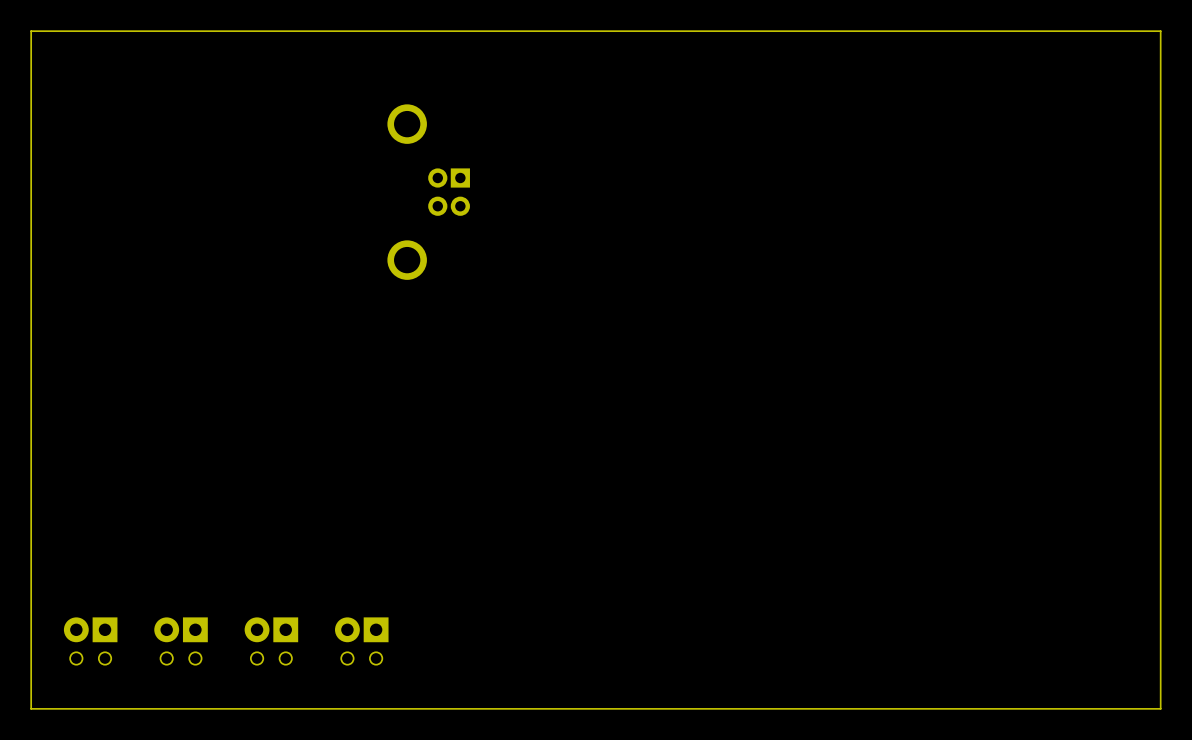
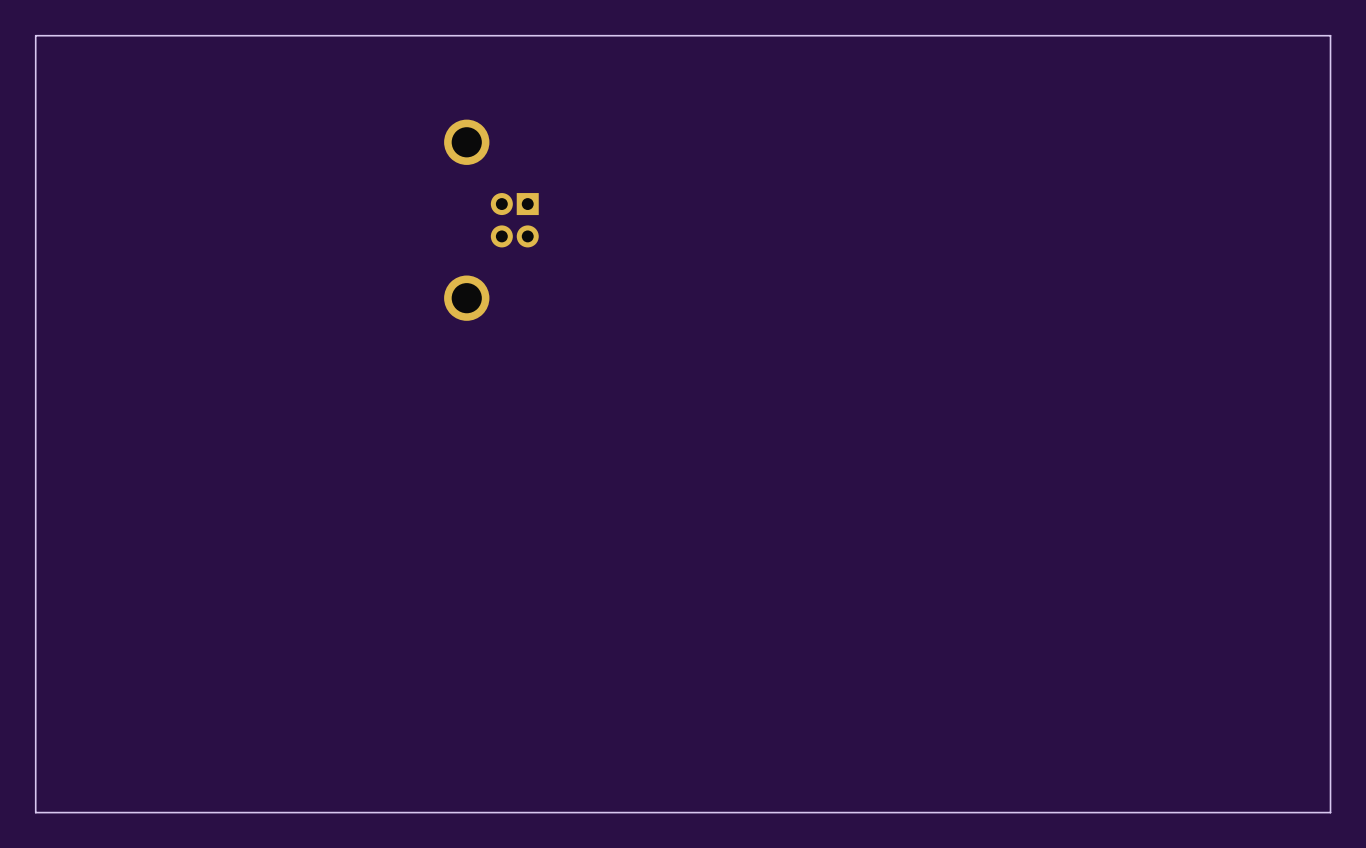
part: (90, 641) -> none
part: (181, 641) -> none
part: (271, 641) -> none
part: (361, 641) -> none

